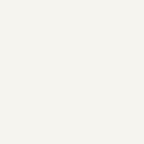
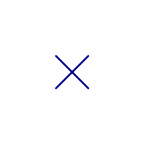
no-connect mark: none -> (72, 72)

